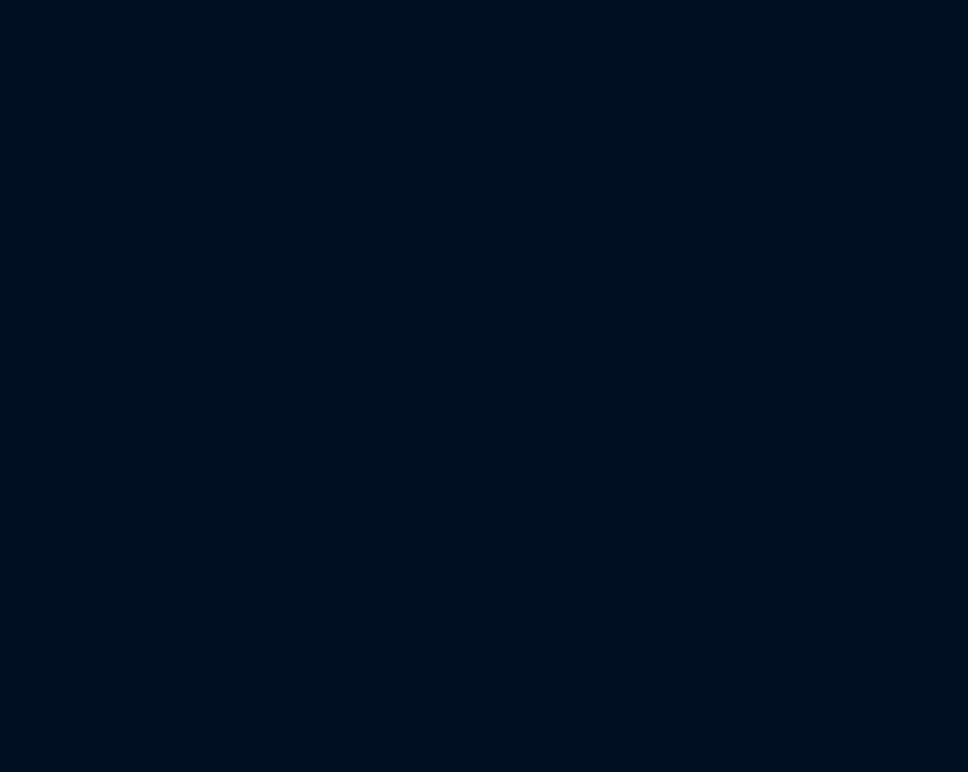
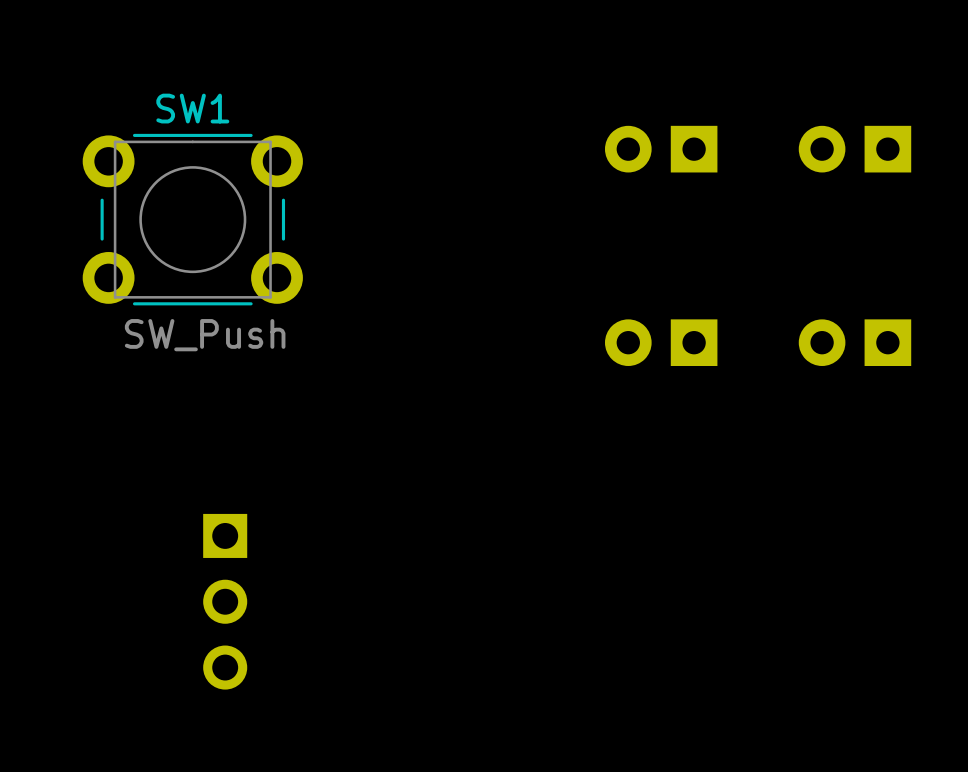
part: none -> (661, 149)
part: none -> (854, 149)
SW1: none -> SW_Push (192, 219)
part: none -> (661, 342)
part: none -> (854, 342)
part: none -> (225, 601)

